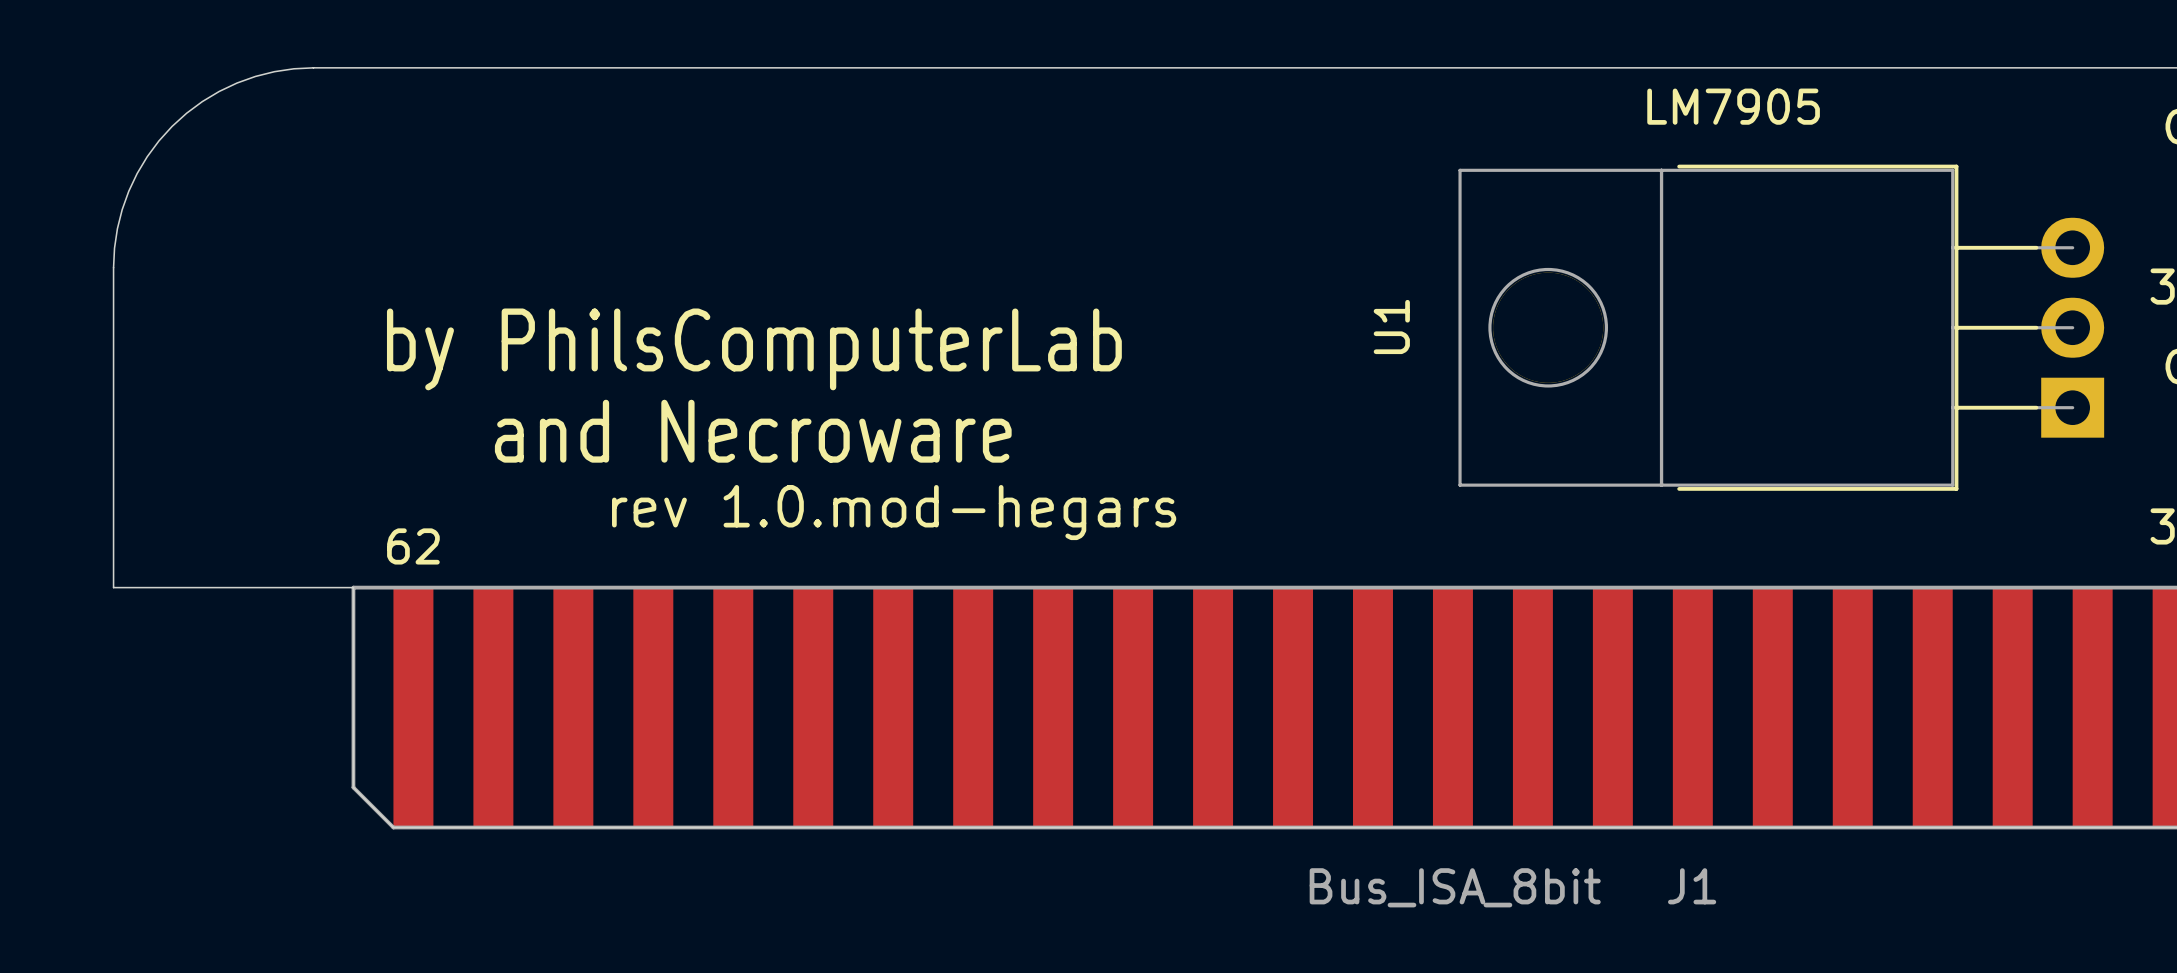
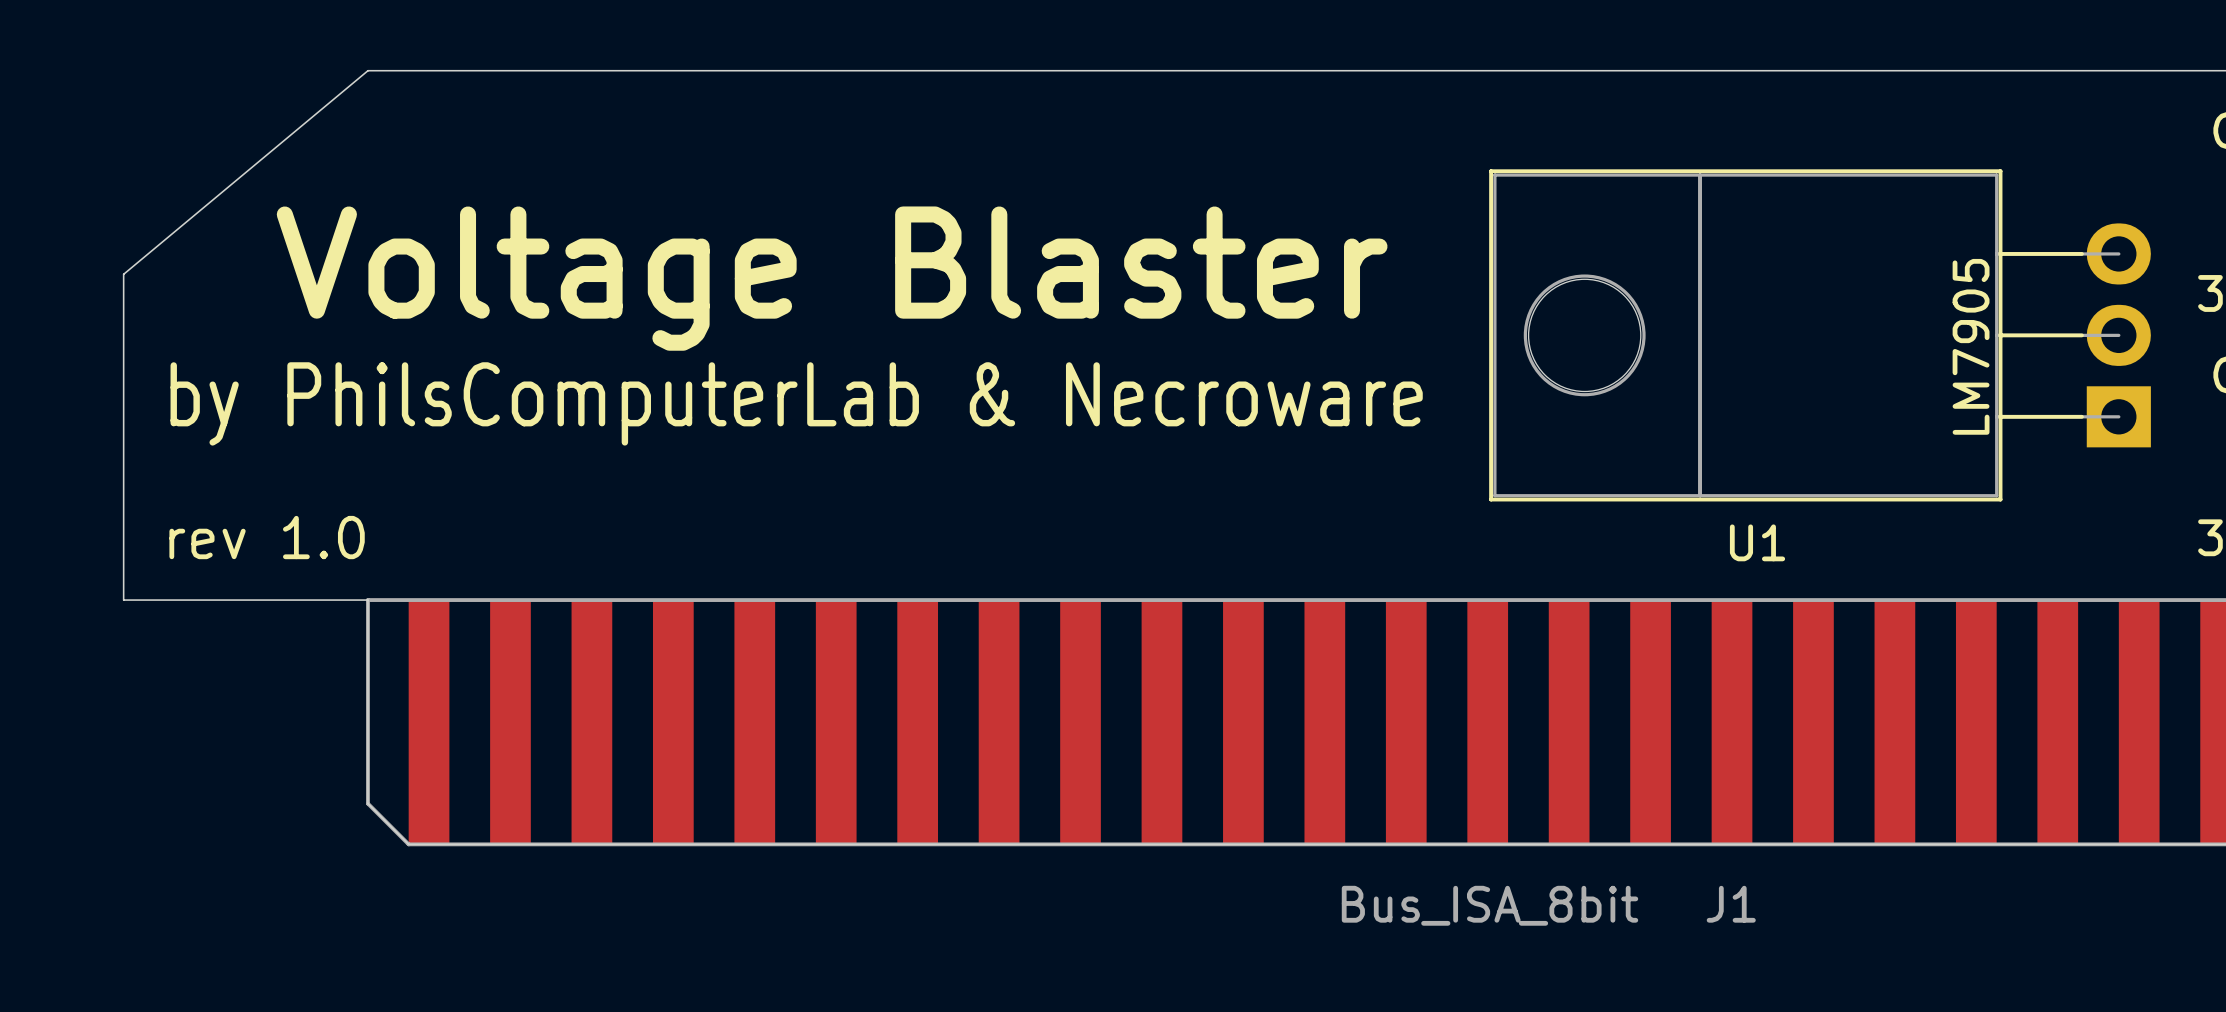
board edge: (353, 67) (293, 68) (255, 76) (219, 91) (186, 113) (158, 140) (137, 173) (128, 191) (117, 228) (113, 267) -> (367, 70) (123, 274)
U1 value position: LM7905 (1733, 106) -> LM7905 (1971, 346)
U1 footprint: [1458, 164, 2105, 491] -> [1489, 169, 2151, 502]
text: none -> Voltage Blaster (832, 278)
U1 name position: U1 (1391, 326) -> U1 (1757, 542)
text: by PhilsComputerLab (754, 349) -> by PhilsComputerLab & Necroware (796, 403)
text: and Necroware (753, 431) -> none
text: rev 1.0.mod-hegars (894, 512) -> none
text: none -> rev 1.0 (267, 537)
text: 62 (413, 546) -> none

